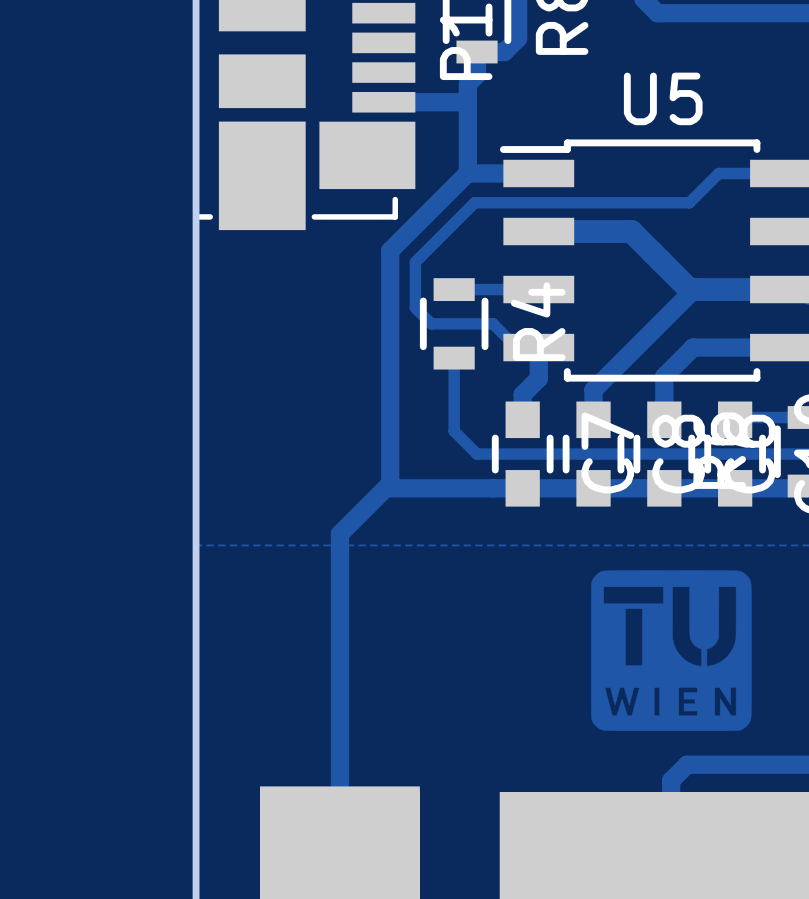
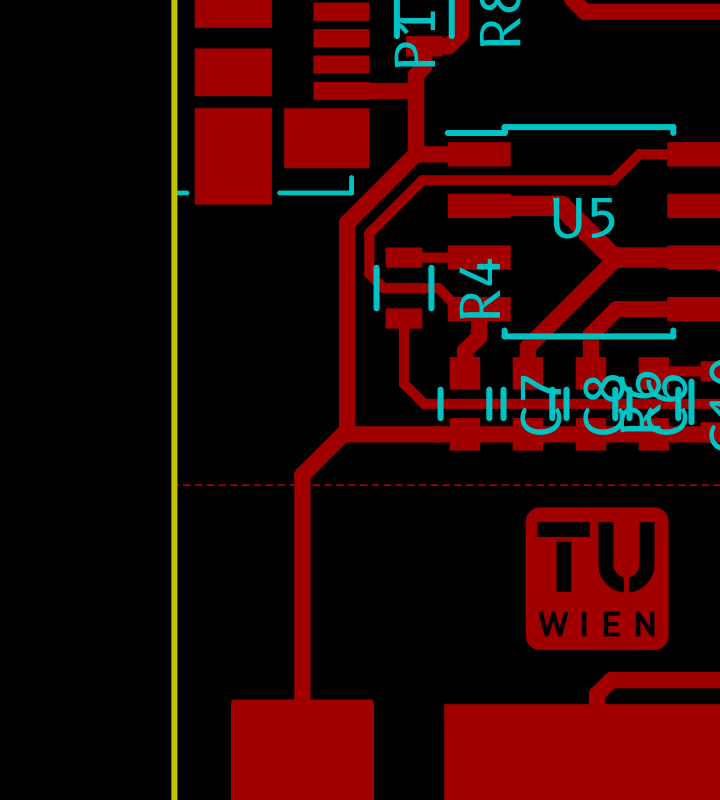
U5 name position: U5 (663, 98) -> U5 (583, 218)

